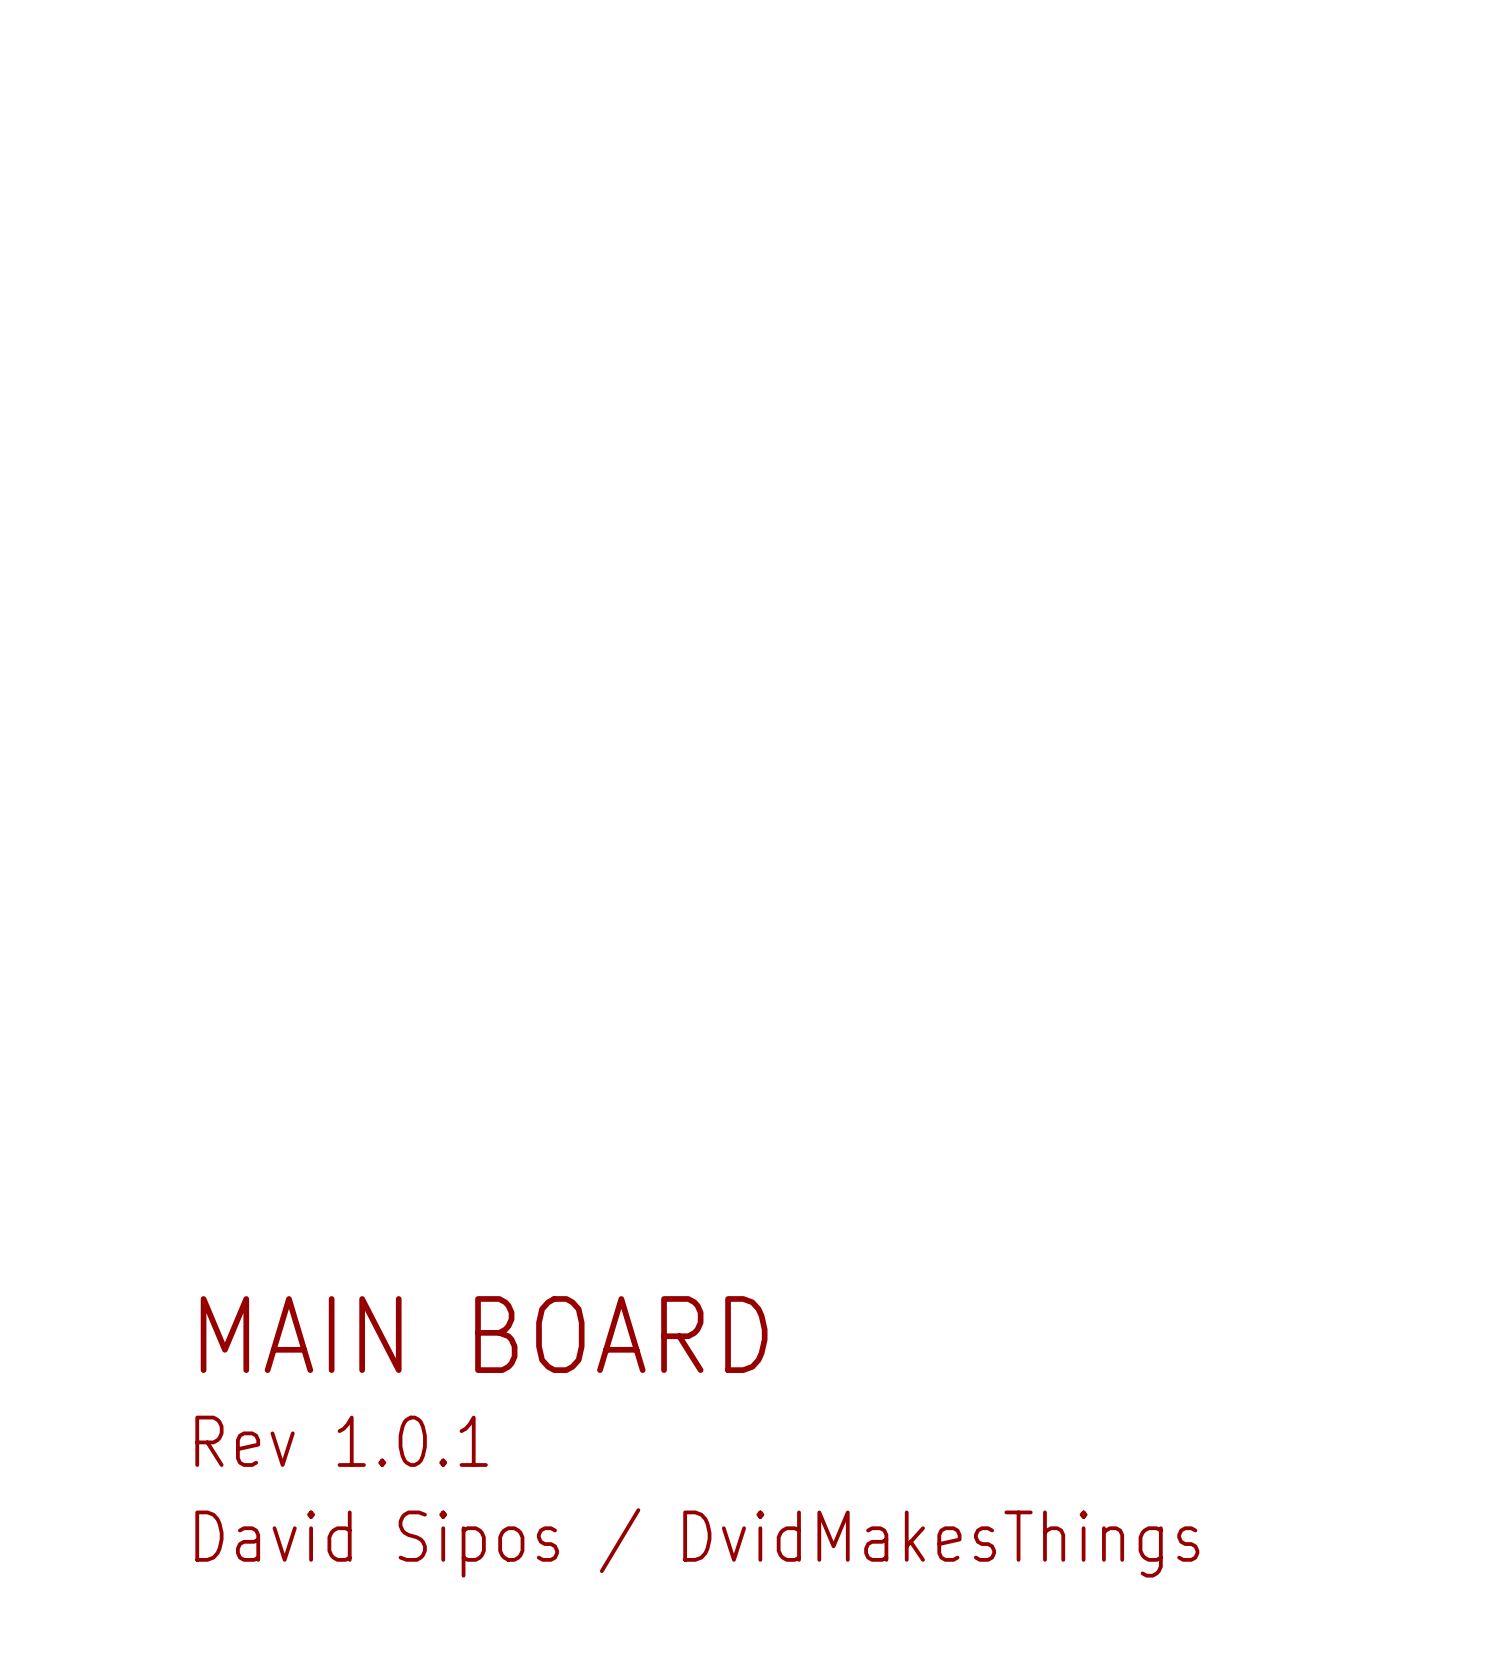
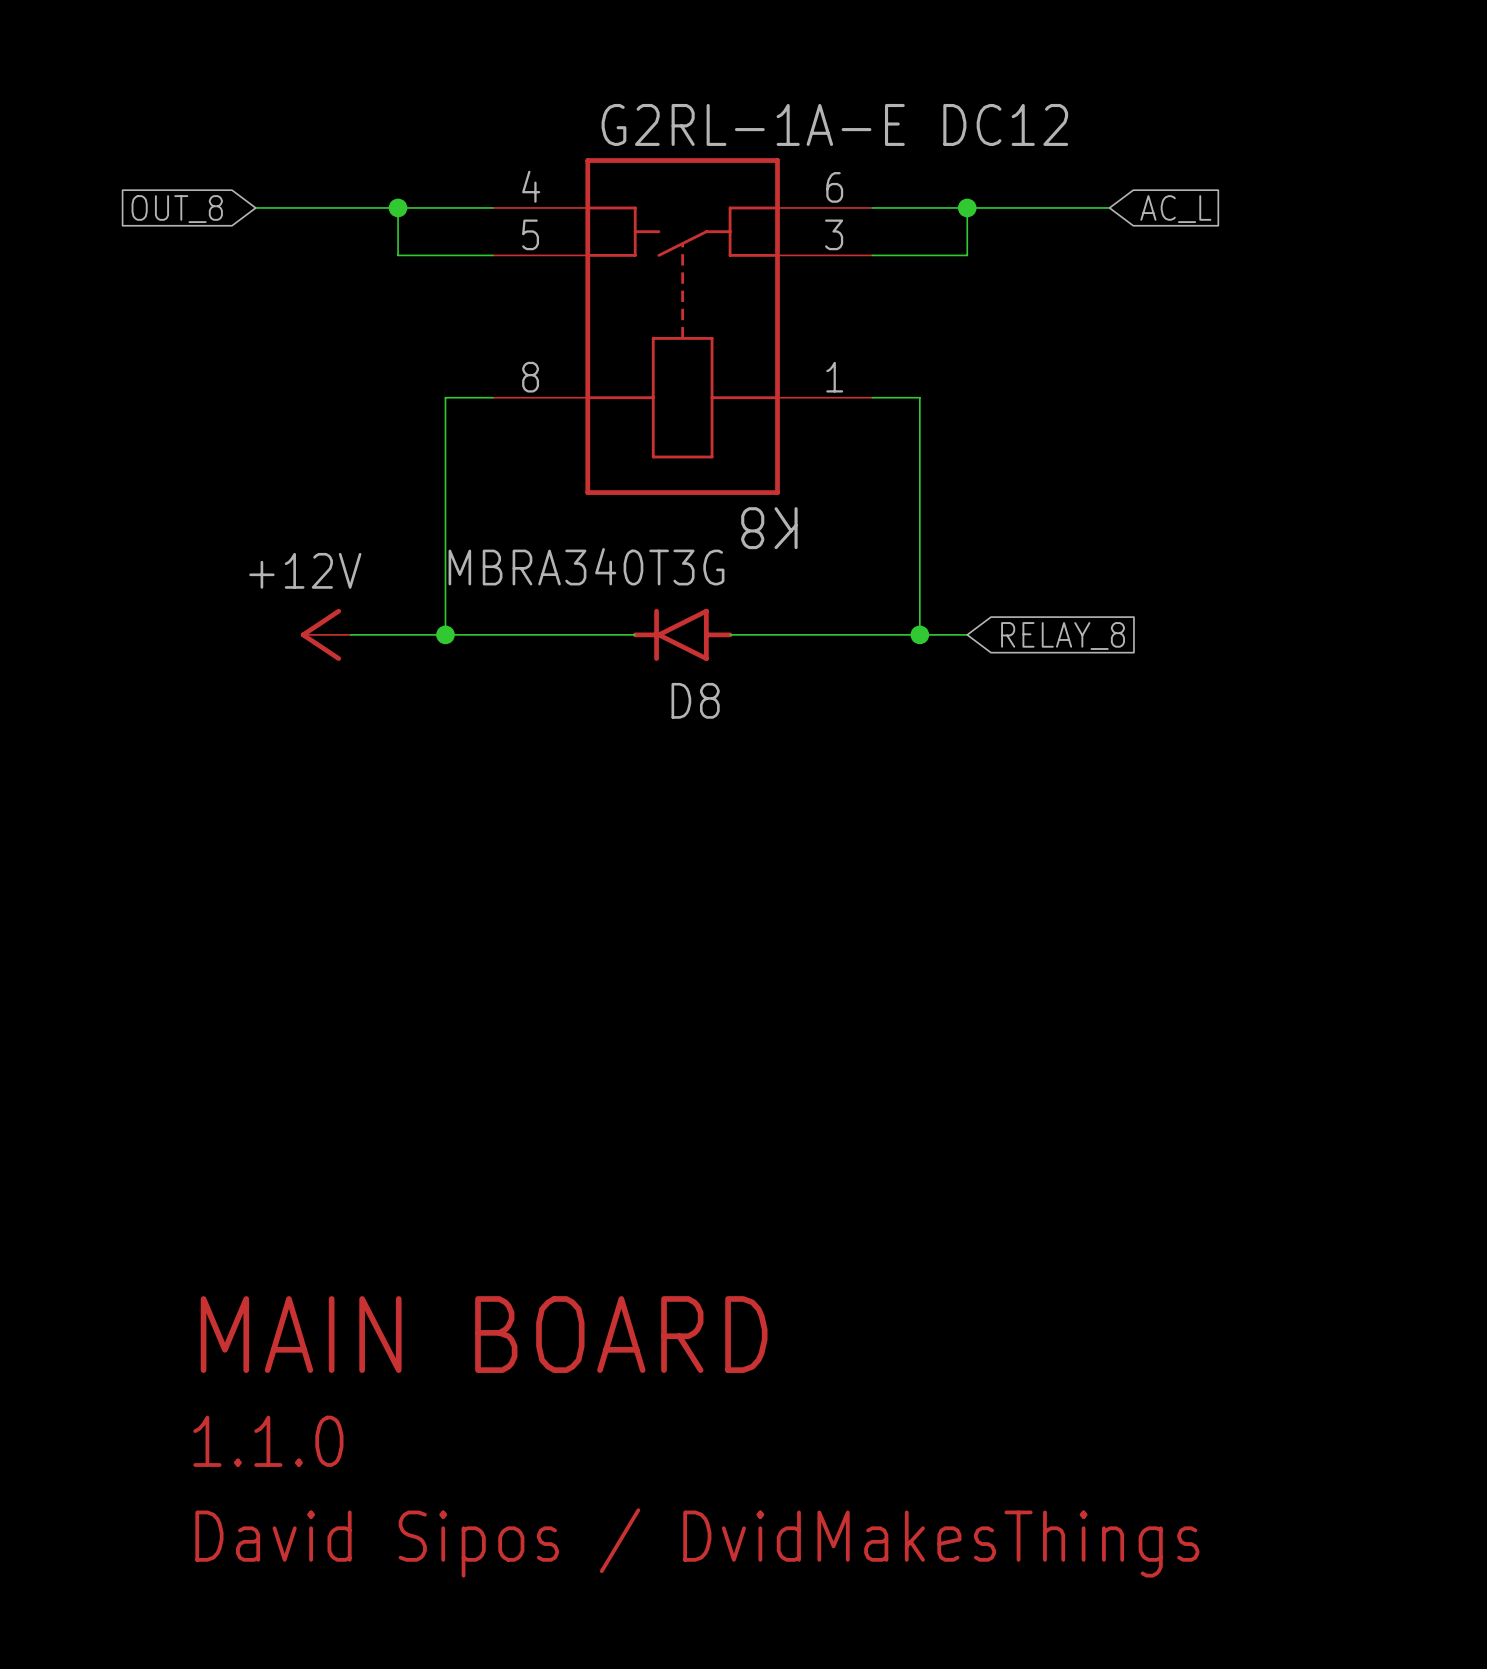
wire: none -> (255, 207) (492, 207)
wire: none -> (398, 207) (398, 255) (492, 255)
junction: none -> (398, 207)
wire: none -> (872, 207) (1109, 207)
wire: none -> (967, 207) (967, 255) (872, 255)
junction: none -> (967, 207)
global label: none -> OUT_8 (177, 209)
global label: none -> AC_L (1175, 209)
K8: none -> G2RL-1A-E DC12 (682, 326)
wire: none -> (492, 397) (445, 397) (445, 634)
wire: none -> (872, 397) (919, 397) (919, 634)
power symbol: none -> +12V (325, 634)
wire: none -> (350, 634) (635, 634)
junction: none -> (445, 634)
D8: none -> MBRA340T3G (682, 634)
wire: none -> (730, 634) (967, 634)
junction: none -> (919, 634)
global label: none -> RELAY_8 (1063, 636)
text: Rev 1.0.1 (341, 1441) -> 1.1.0 (268, 1441)

